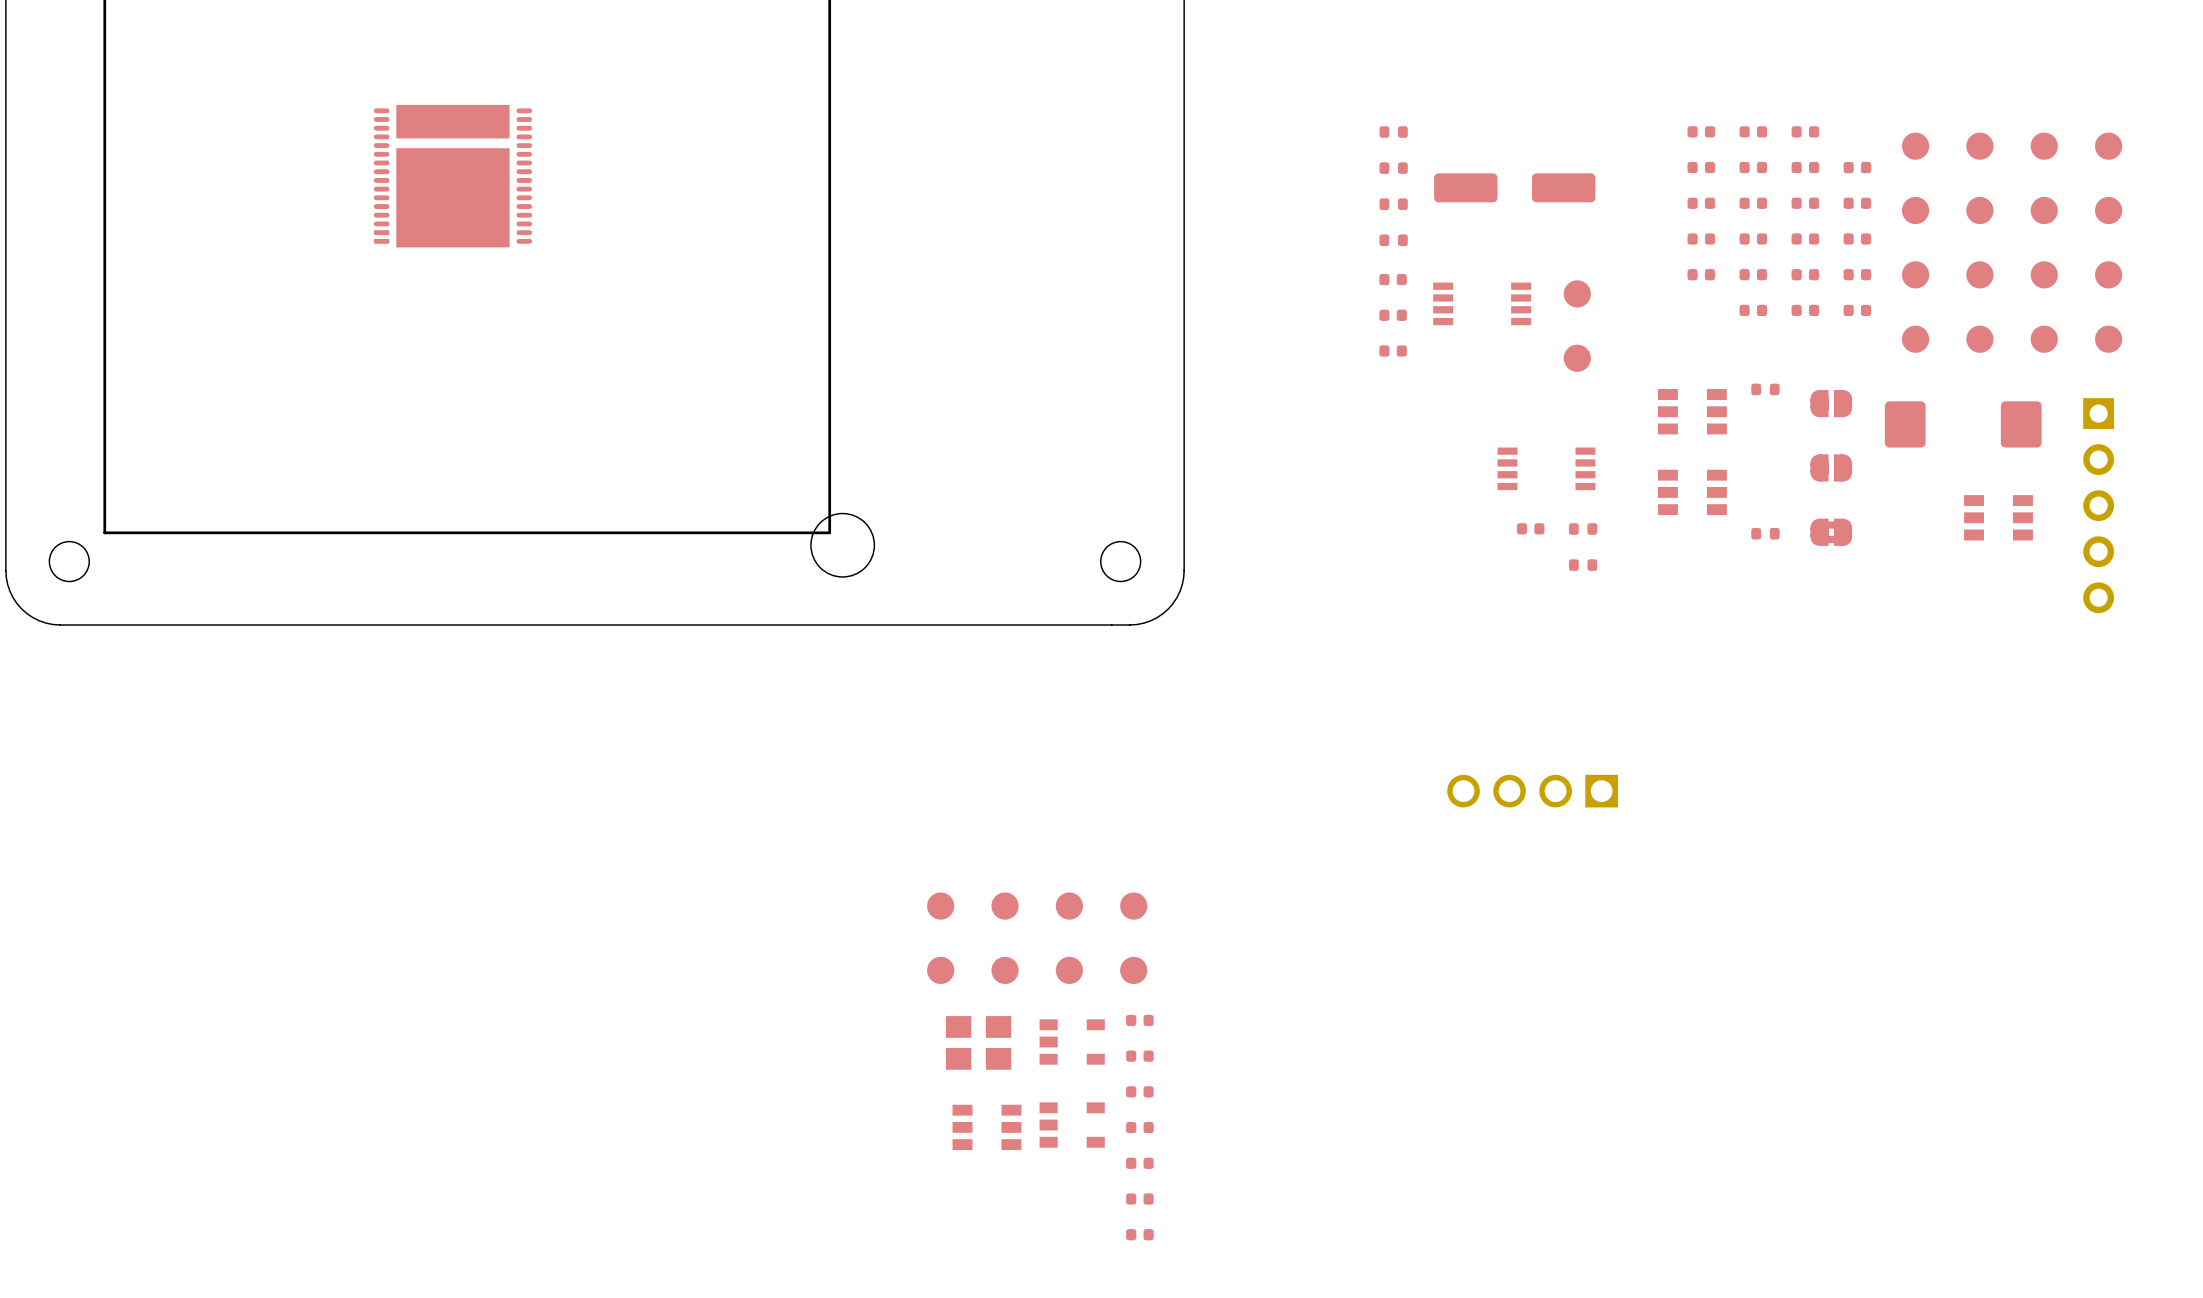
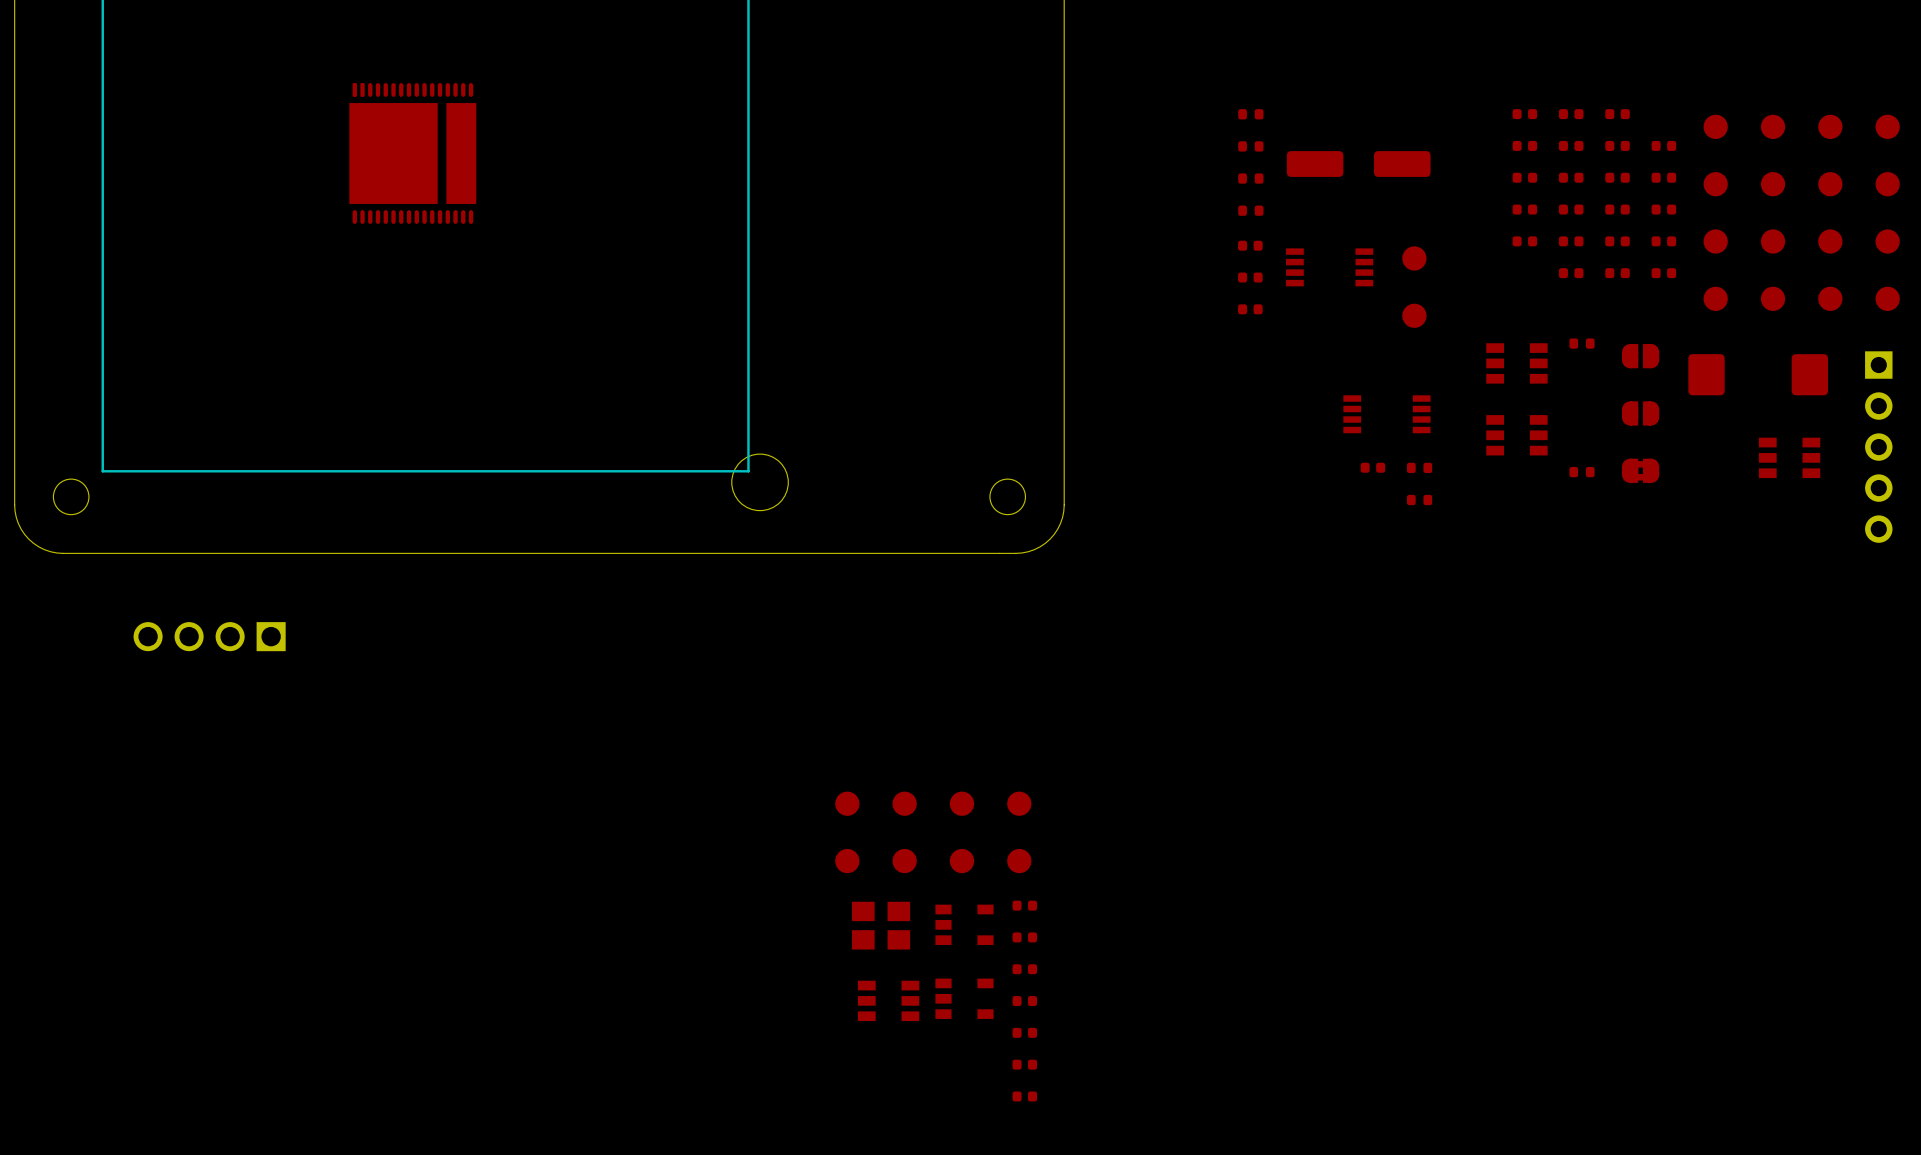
part rotation: 0° (452, 176) -> 90° clockwise (412, 153)
part: none -> (209, 636)
part: (1532, 791) -> none

